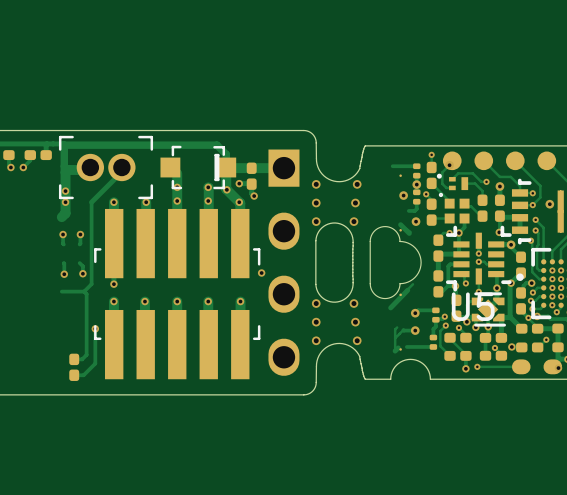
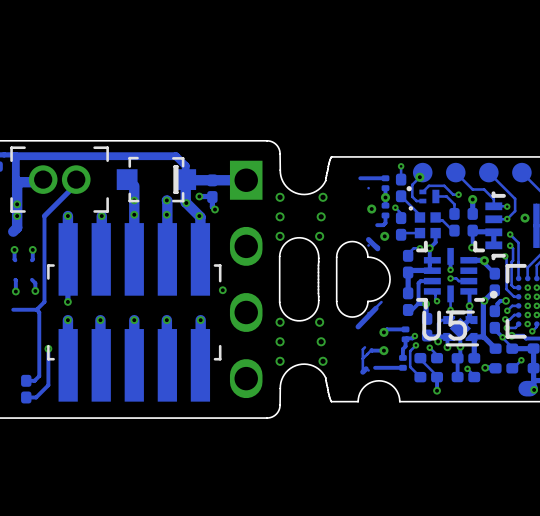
via: (477, 366) -> none
track: (521, 366) (477, 366) -> none
part: (521, 366) -> none

